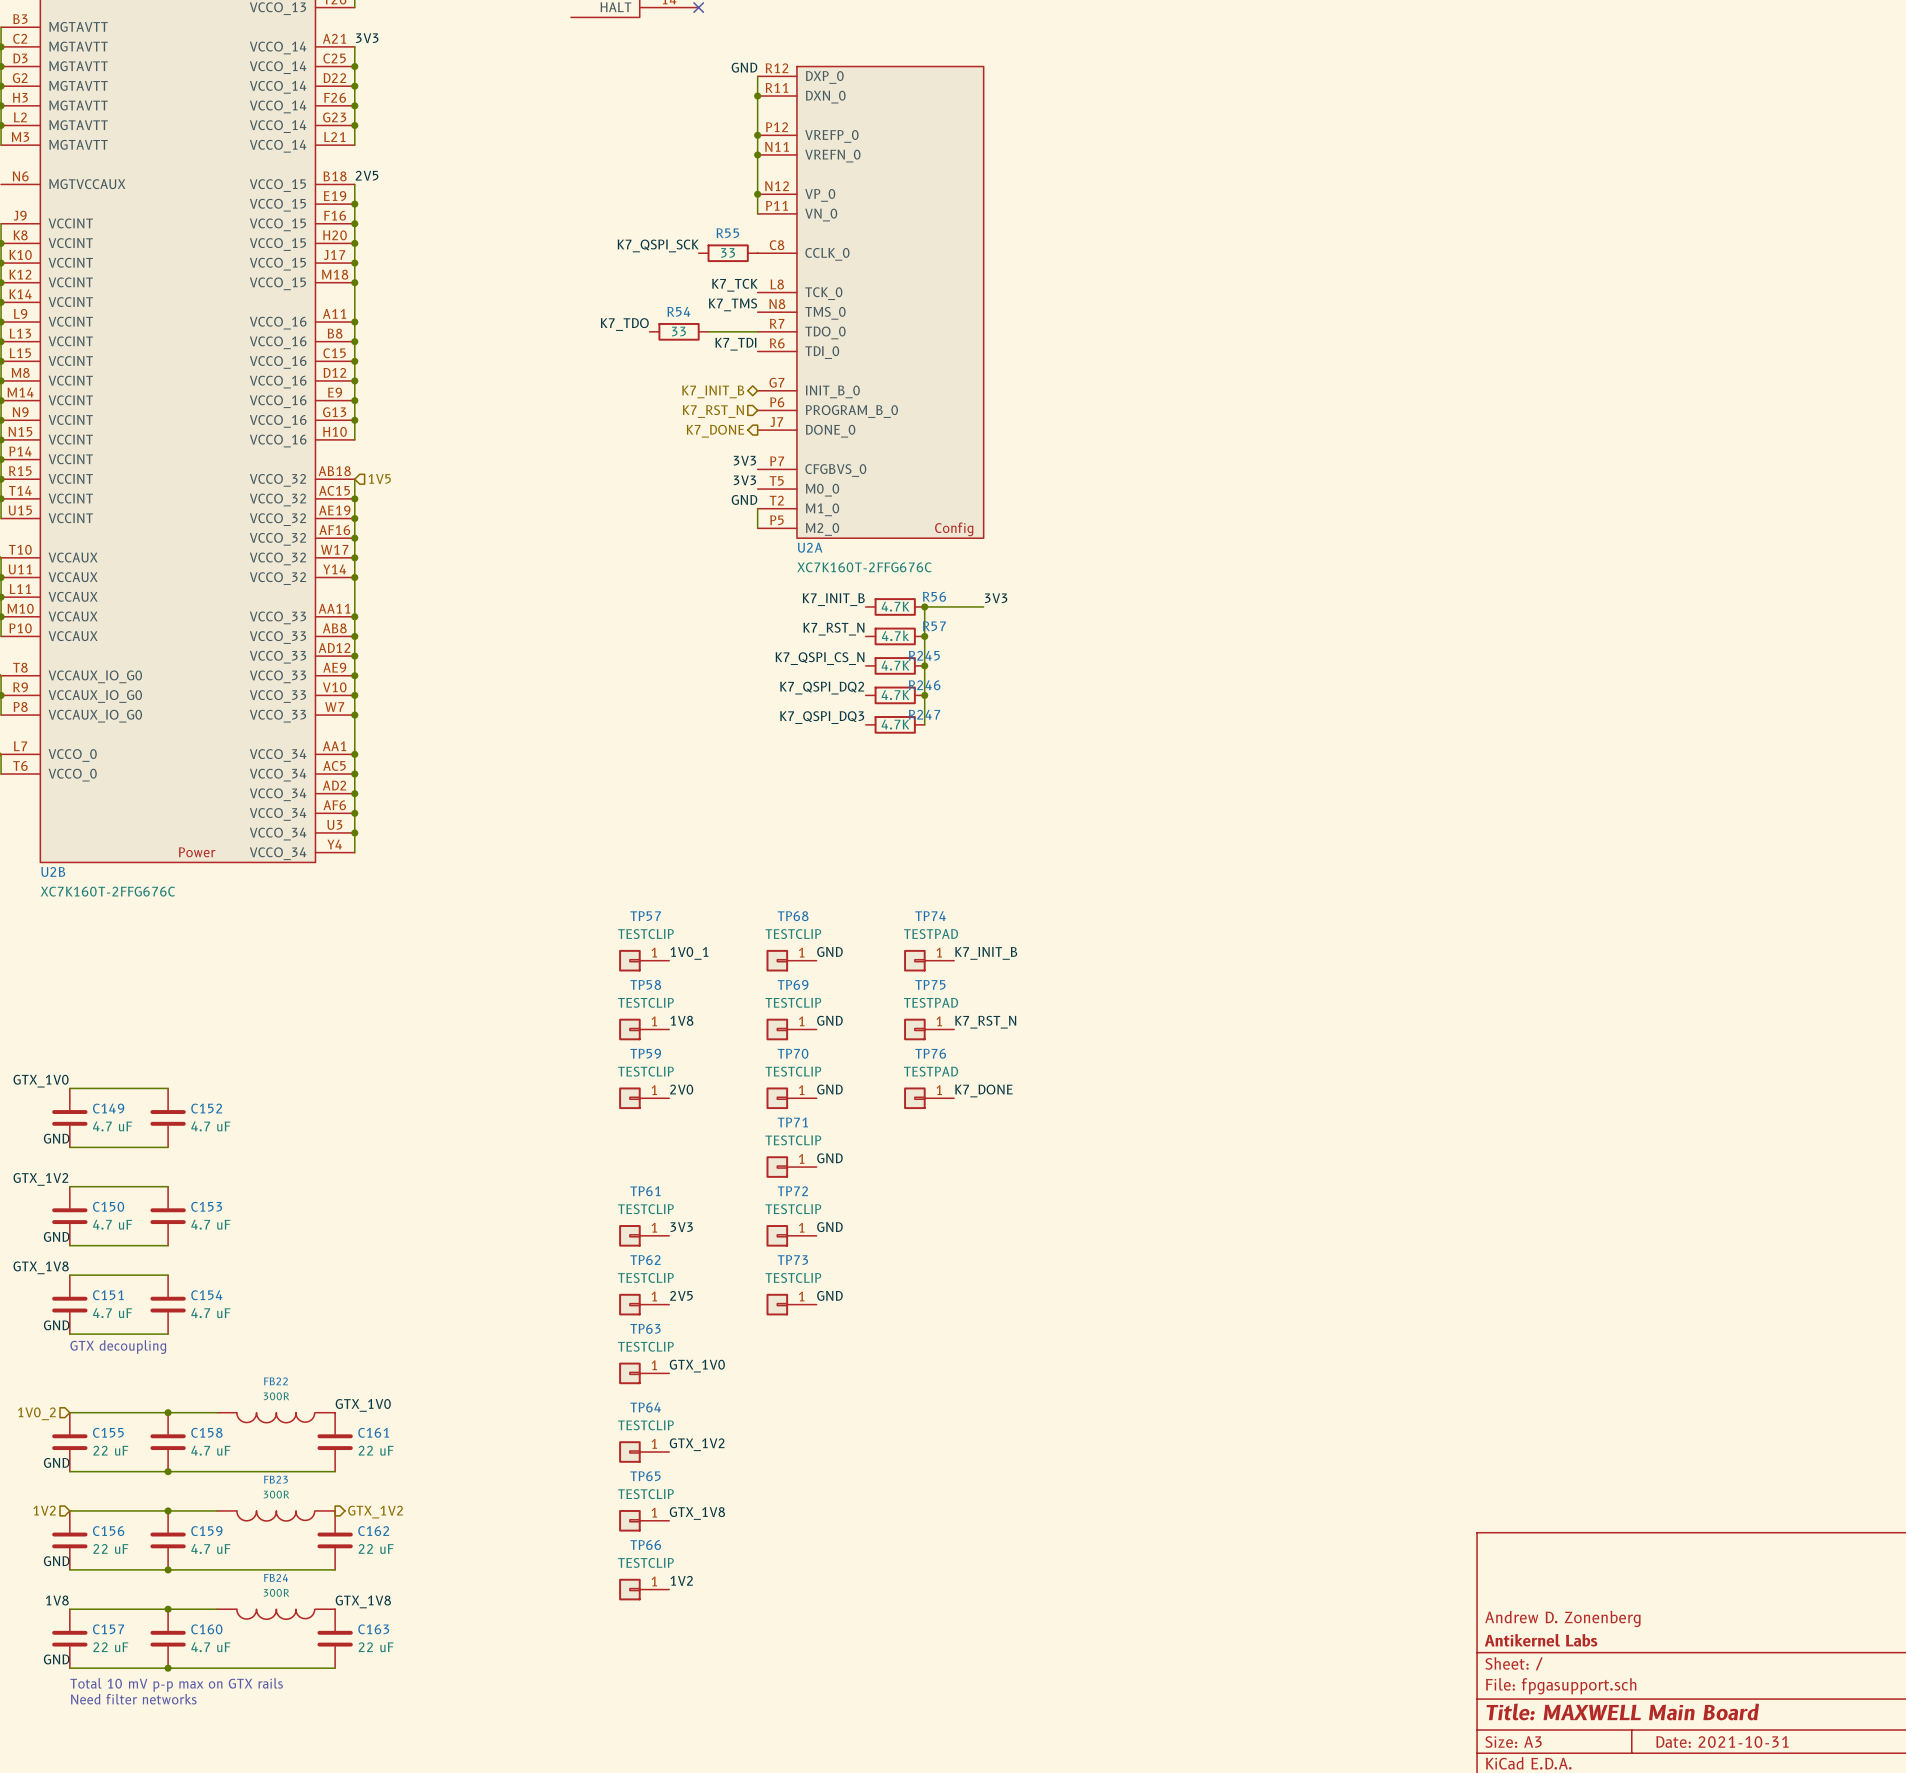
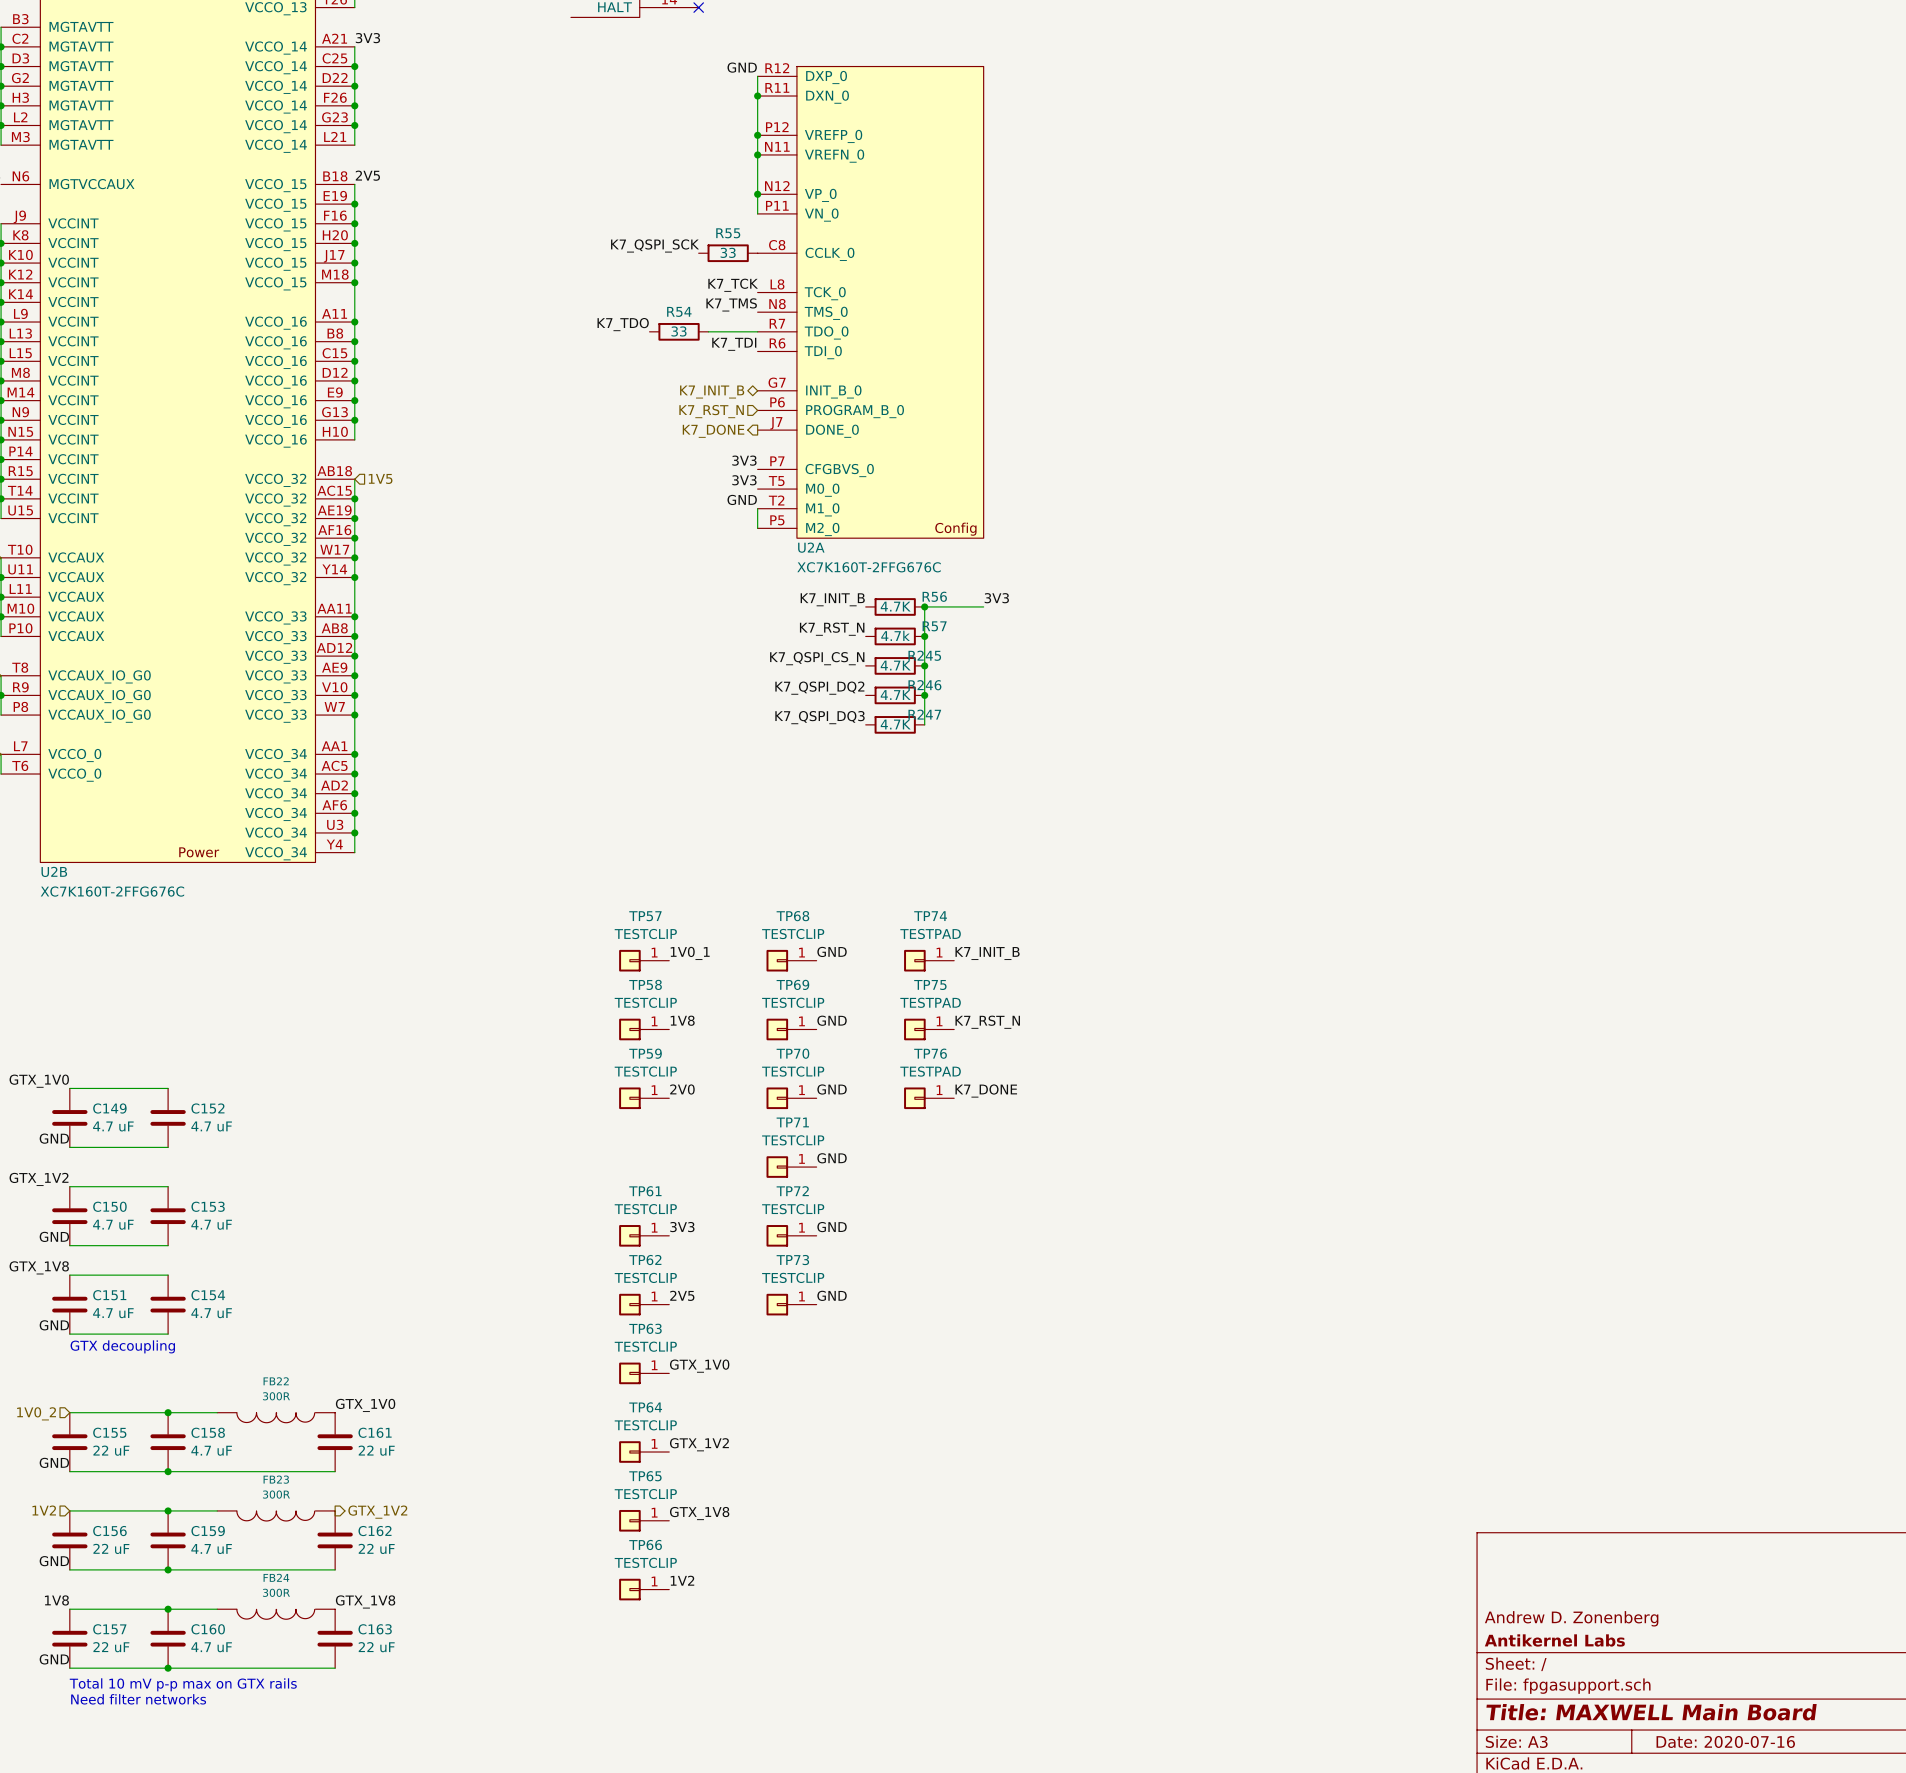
title block: Date: 2021-10-31 (1722, 1742) -> Date: 2020-07-16 (1725, 1741)

